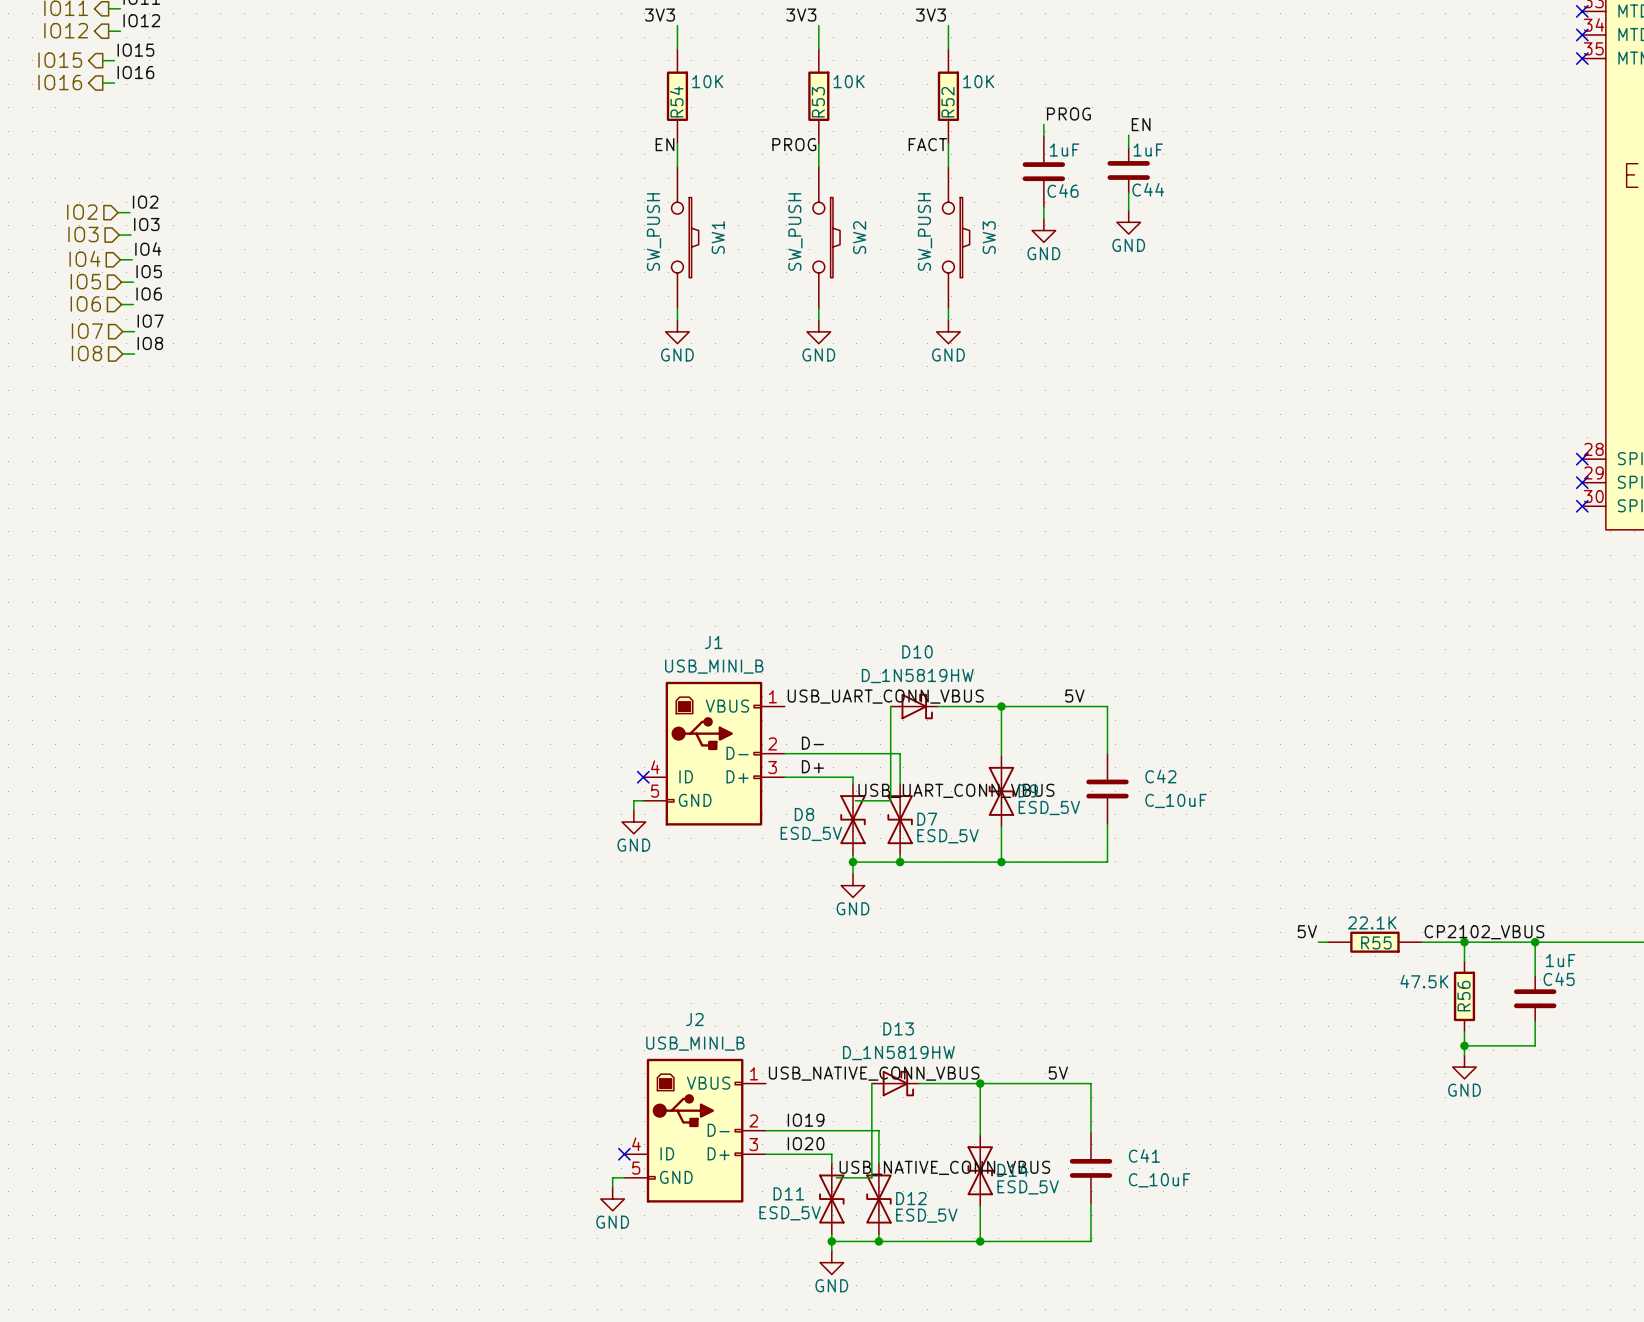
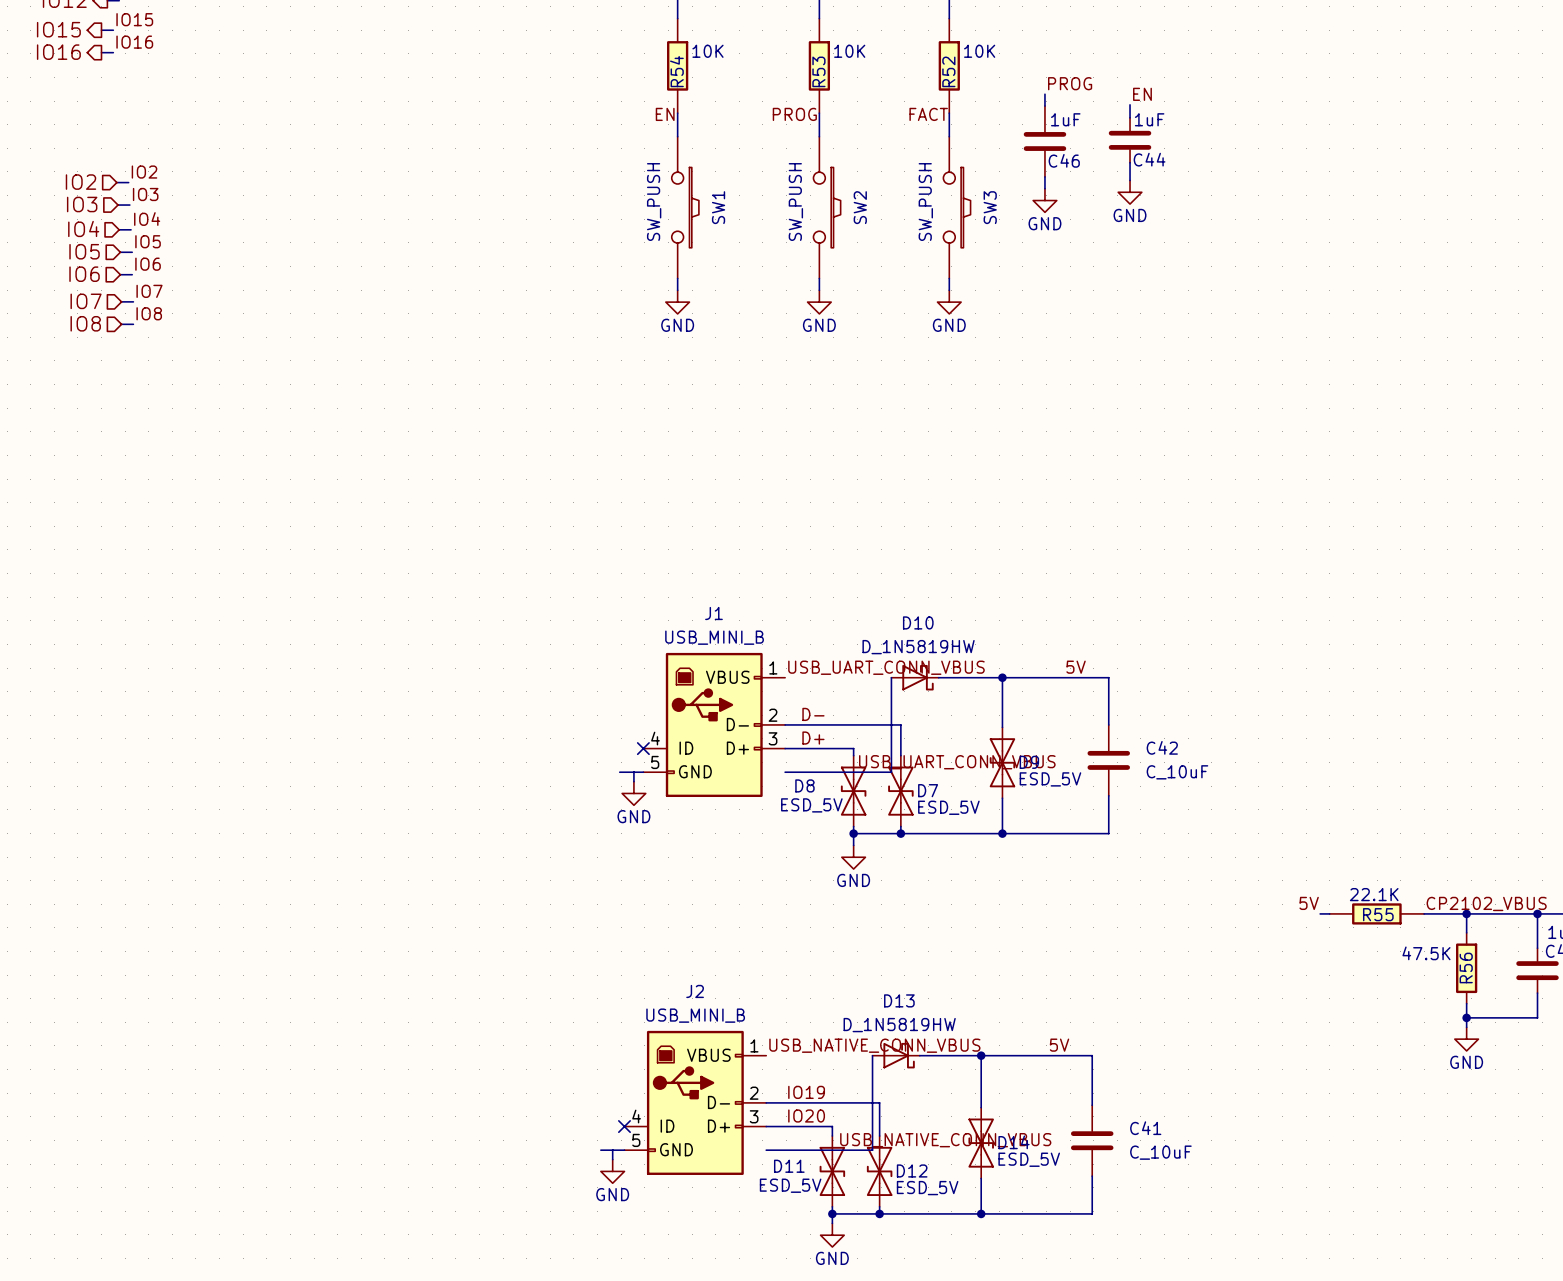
wire: none -> (619, 772) (633, 772)
wire: none -> (785, 772) (855, 772)
wire: none -> (600, 1150) (612, 1150)
wire: none -> (766, 1150) (837, 1150)

